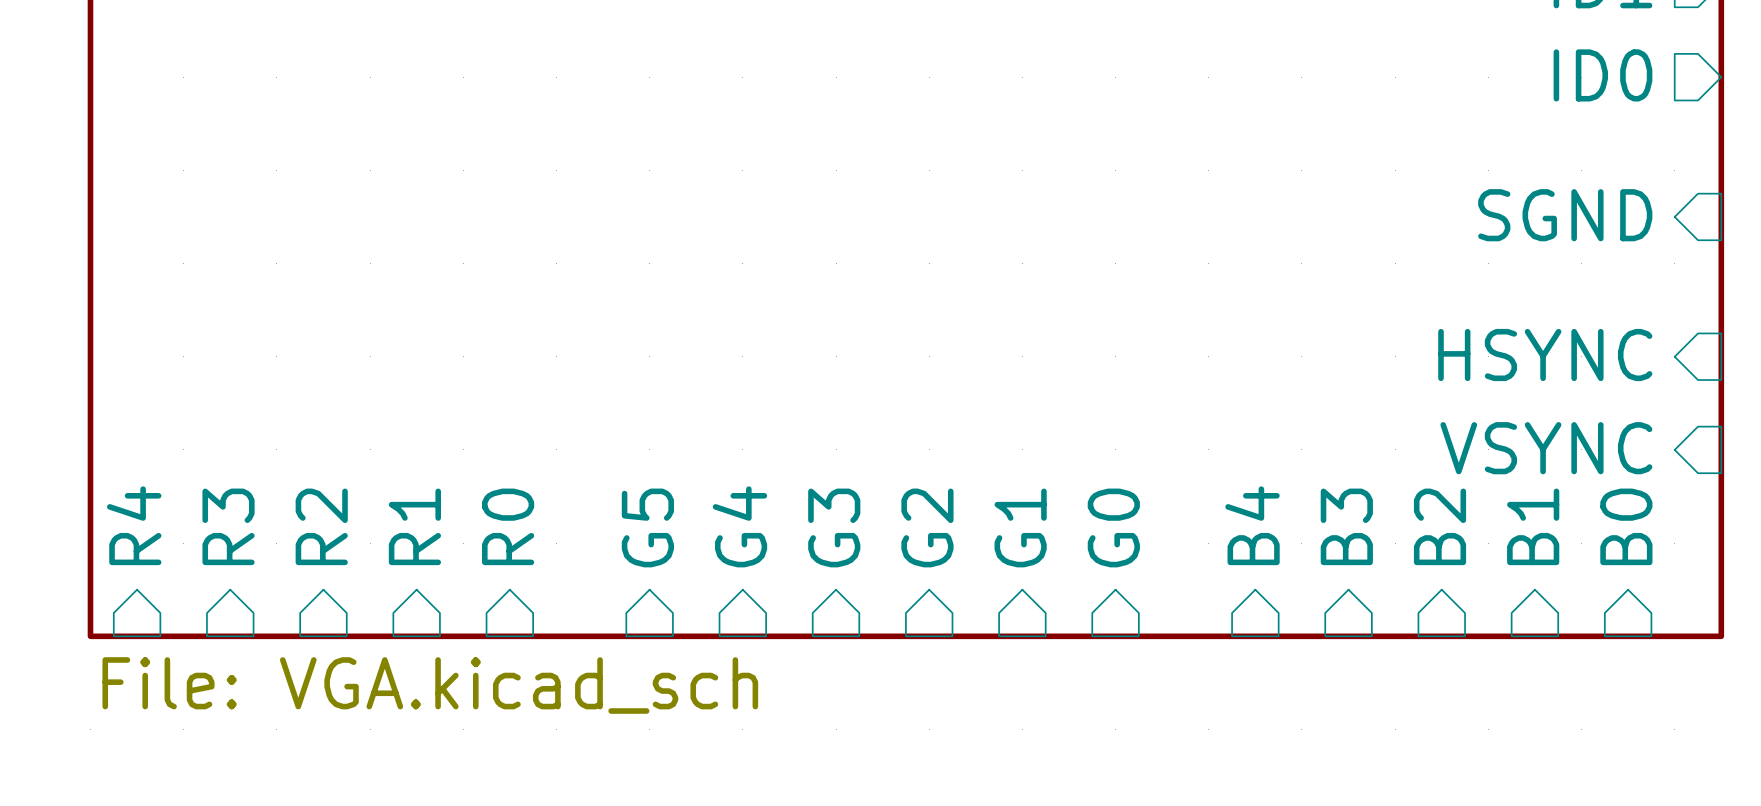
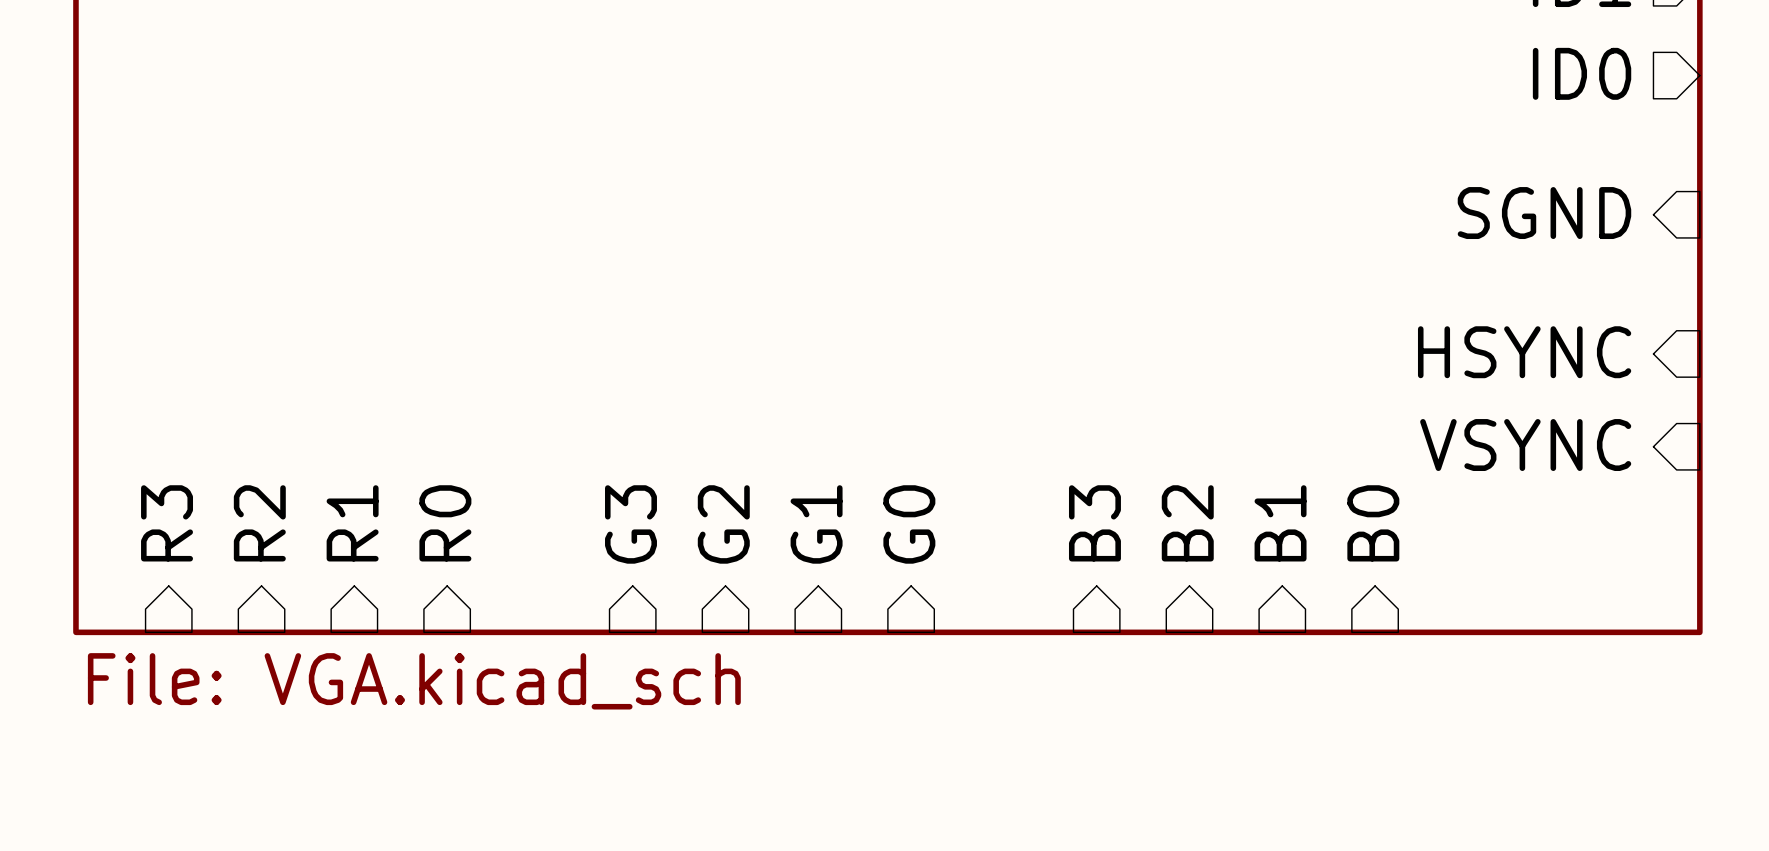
sheet pin: R4 (134, 525) -> none
sheet pin: B4 (1252, 525) -> none
sheet pin position: R3 (228, 526) -> R3 (167, 523)
sheet pin position: R2 (321, 526) -> R2 (259, 523)
sheet pin position: R1 (414, 526) -> R1 (352, 523)
sheet pin position: R0 (508, 526) -> R0 (445, 523)
sheet pin: G4 (739, 526) -> G2 (723, 524)
sheet pin: B3 (1346, 526) -> none
sheet pin position: B2 (1439, 526) -> B2 (1187, 523)
sheet pin position: B1 (1533, 526) -> B1 (1280, 523)
sheet pin position: B0 (1626, 526) -> B0 (1373, 523)
sheet pin: G5 (647, 527) -> G3 (630, 524)
sheet pin: G3 (834, 527) -> G1 (816, 524)
sheet pin: G2 (927, 527) -> G0 (909, 524)
sheet pin: G1 (1020, 527) -> none
sheet pin: G0 (1113, 527) -> B3 (1094, 523)

